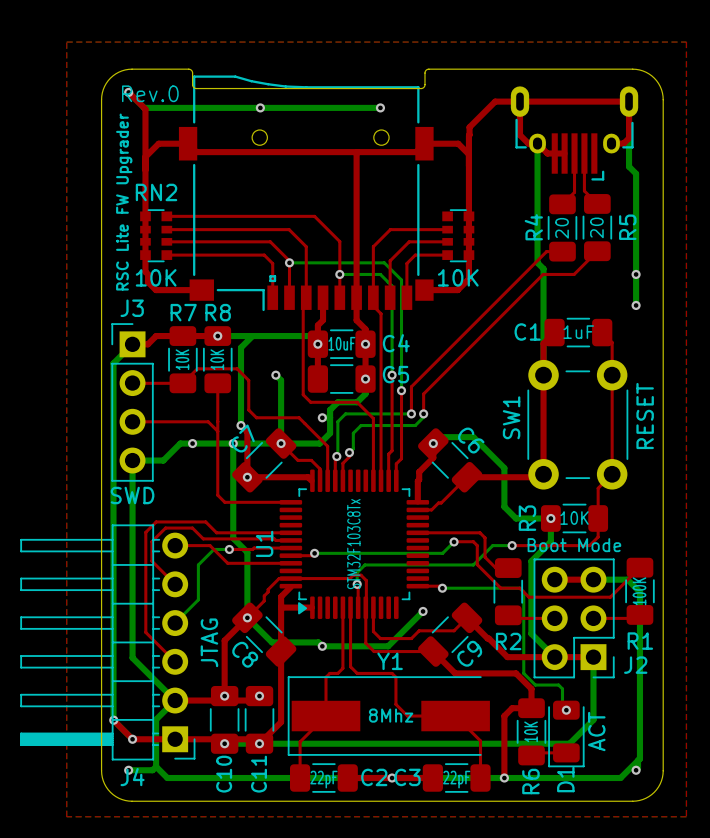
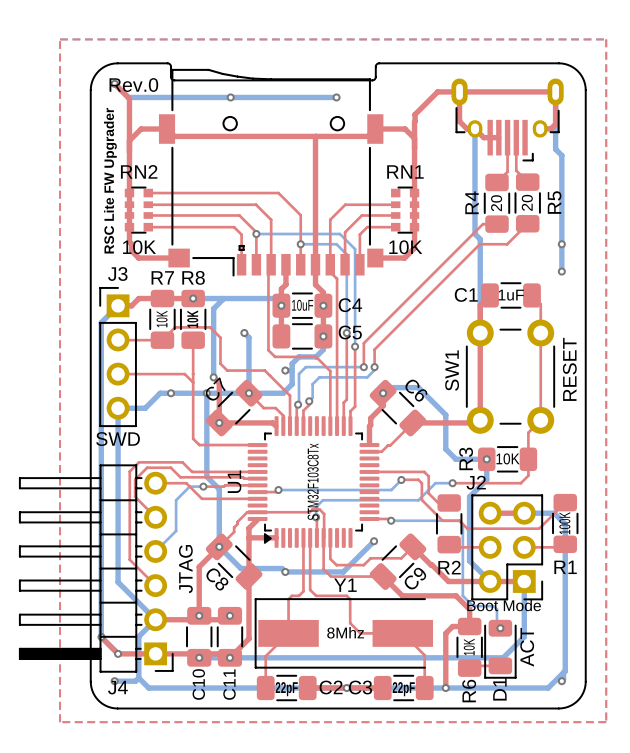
RN1 name: none -> RN1 (405, 171)
J2 value position: Boot Mode (574, 545) -> Boot Mode (504, 605)
J2 name position: J2 (635, 665) -> J2 (476, 482)

